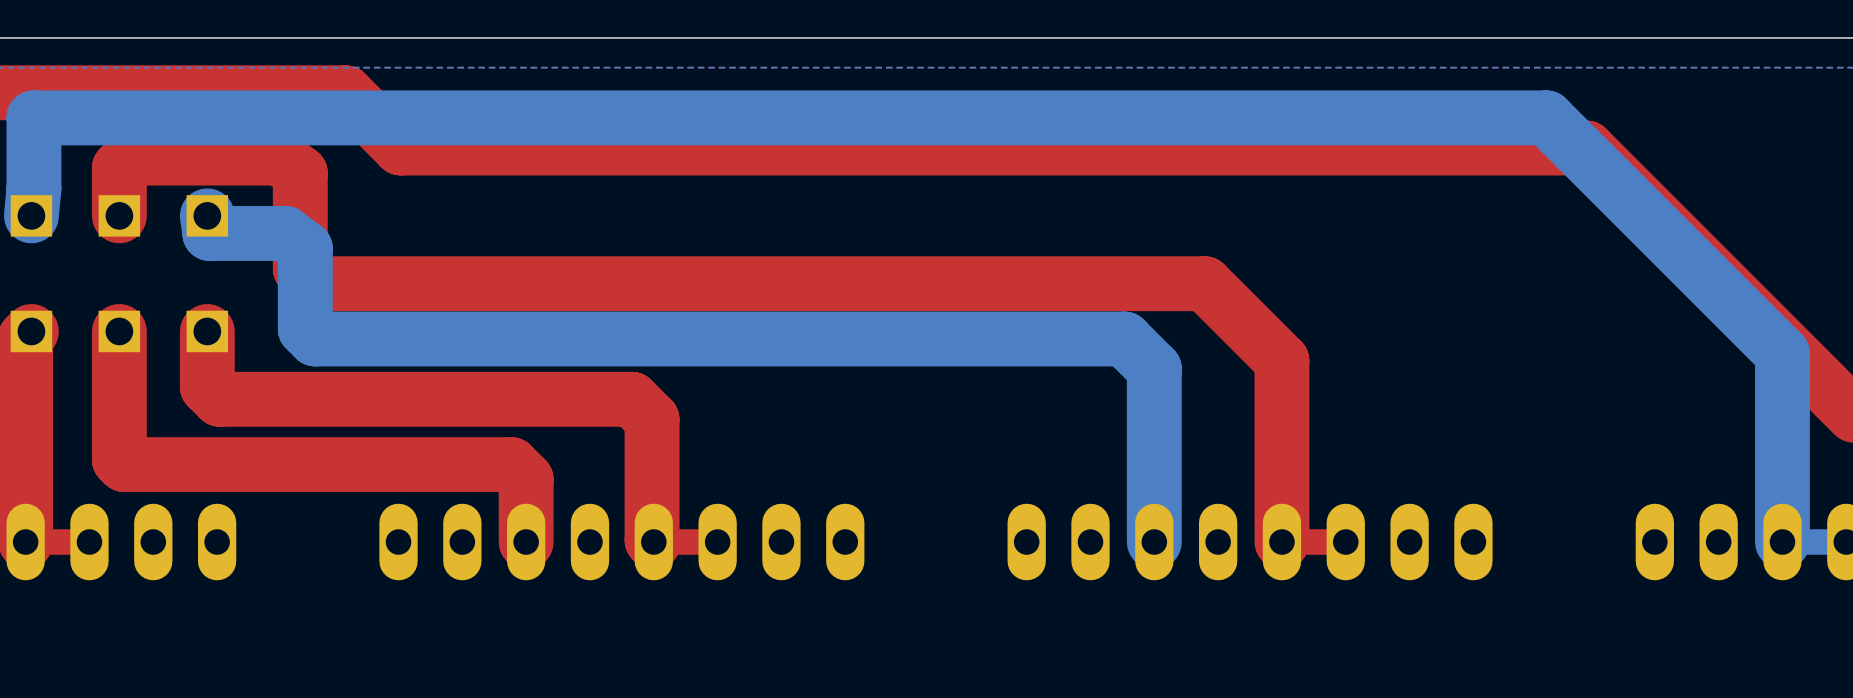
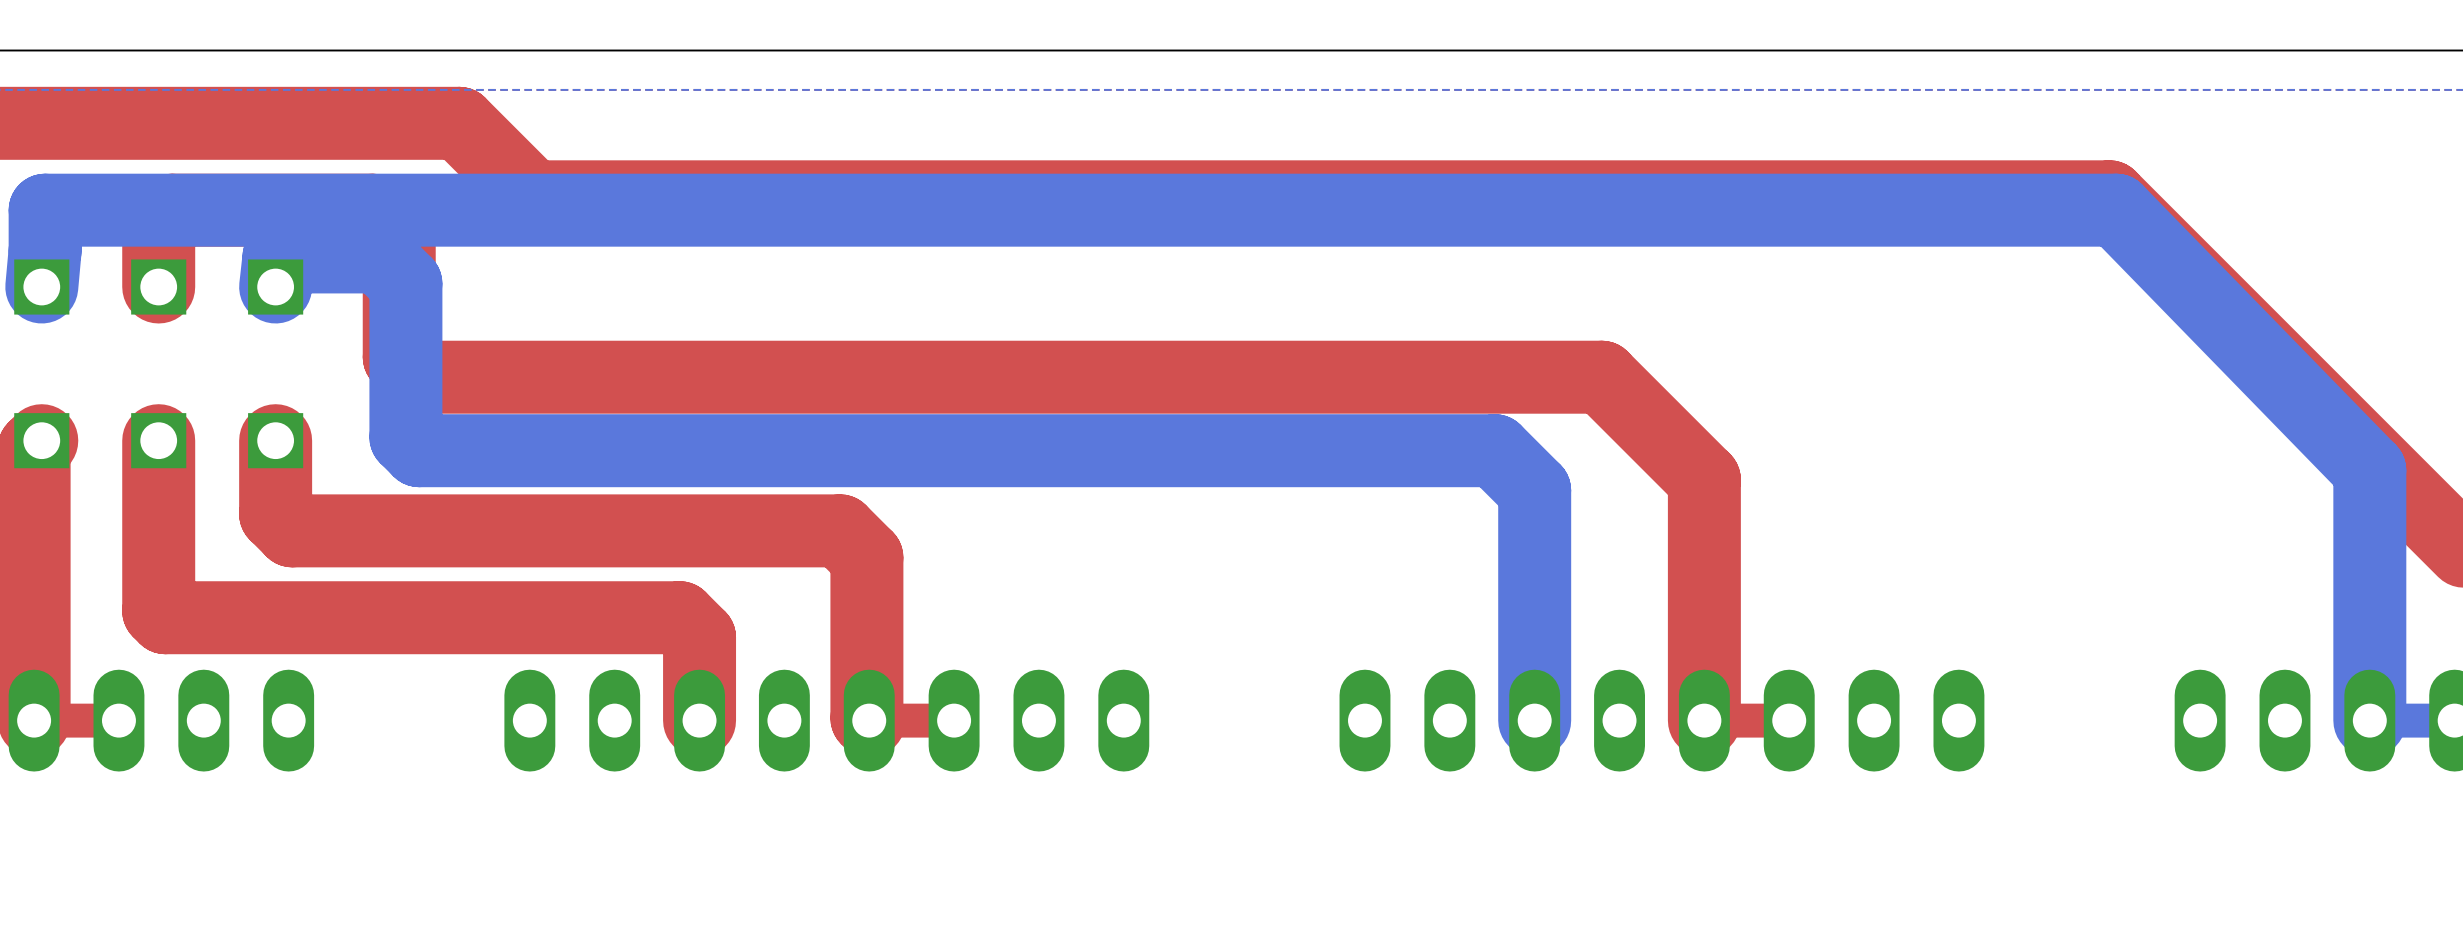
bottom track: (33, 158) (33, 117) (1546, 117) (1782, 353) -> (45, 210) (2116, 210) (2369, 470)
bottom track: (207, 215) (209, 233) (285, 233) (305, 248) -> (275, 287) (278, 256) (379, 256) (405, 283) (405, 330)

